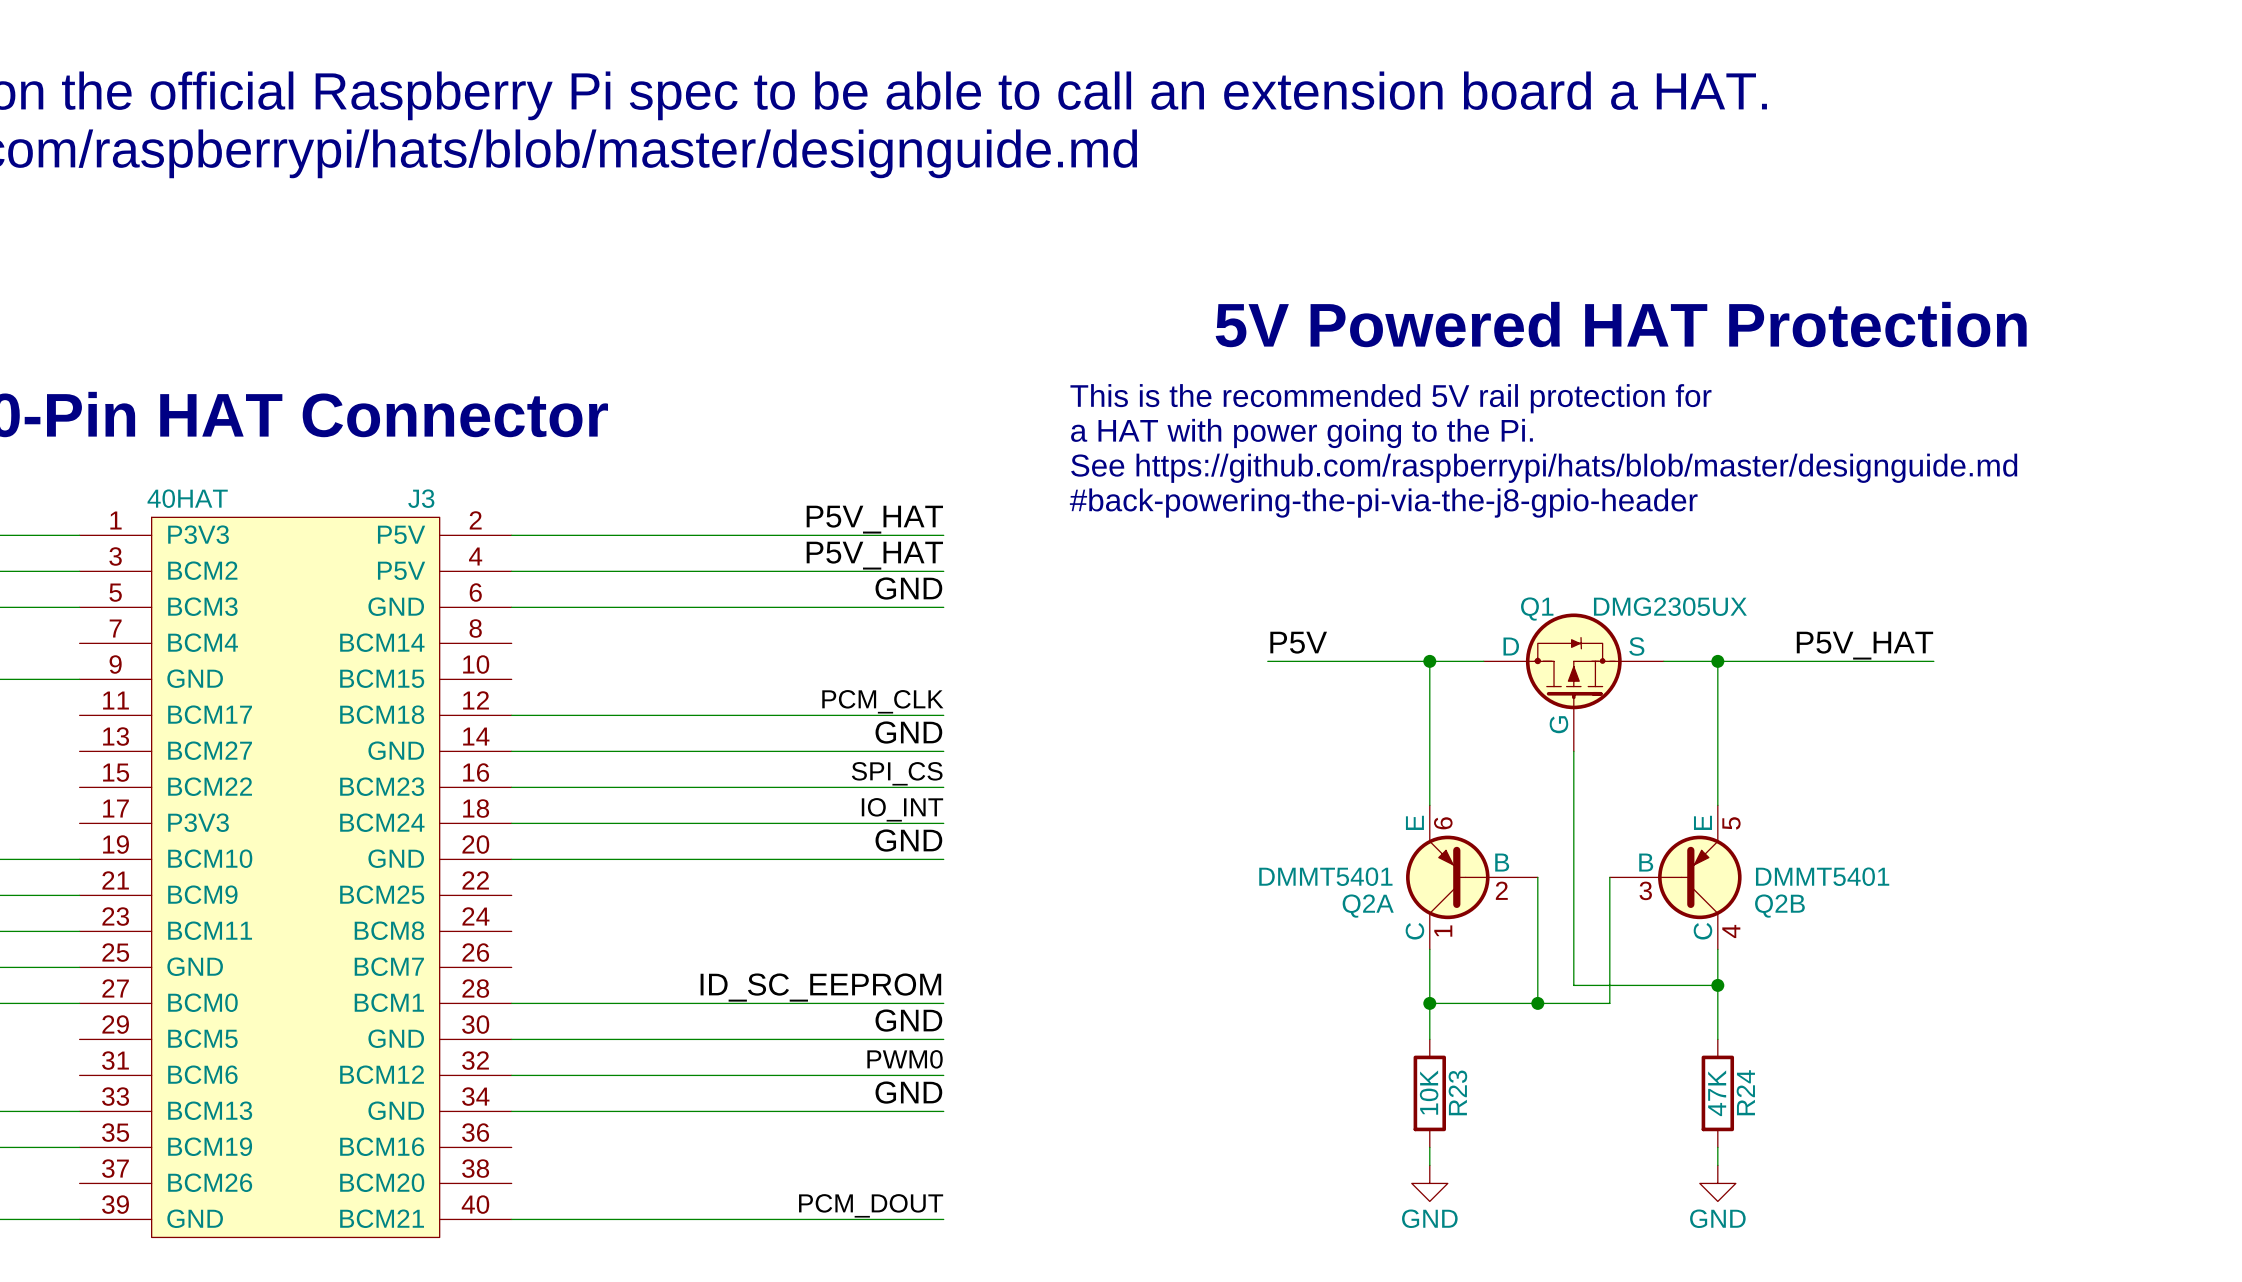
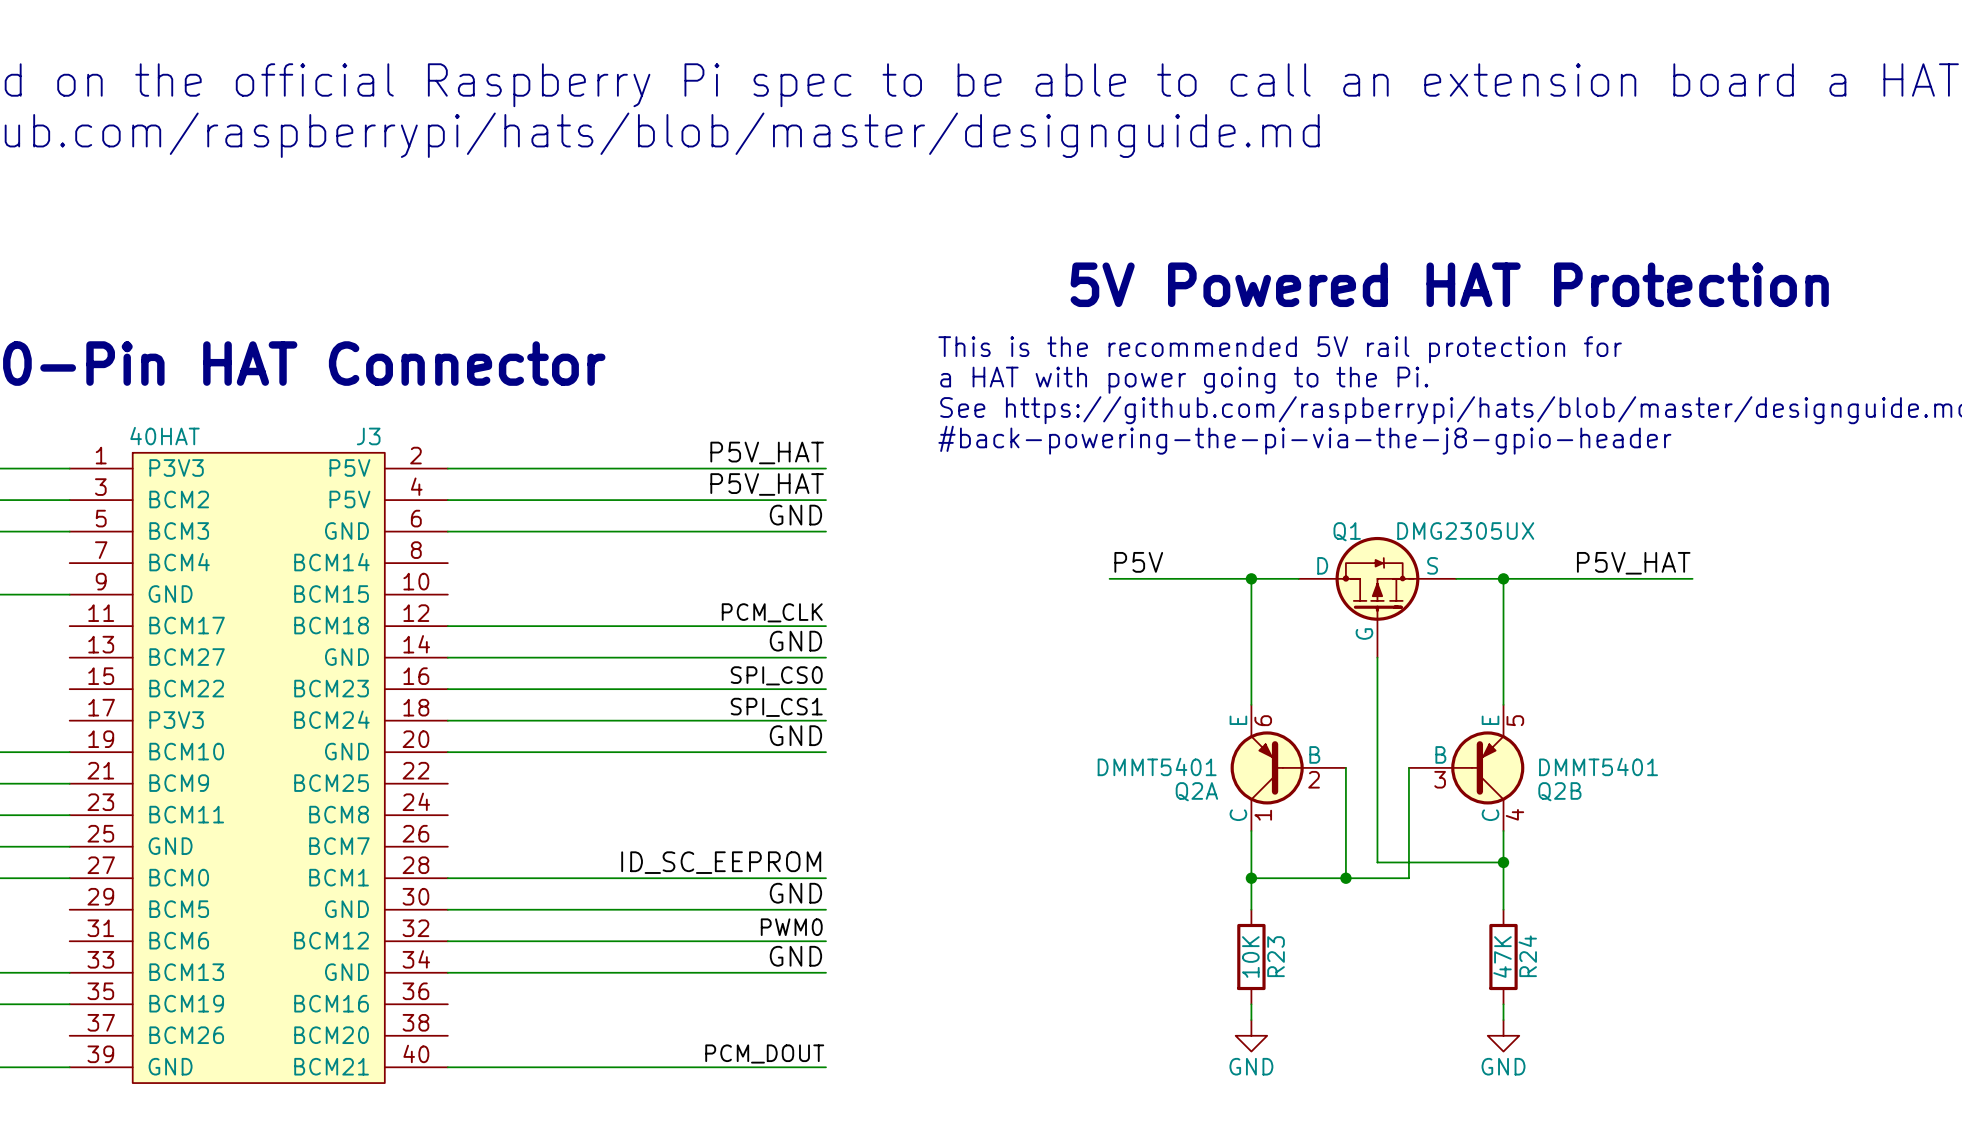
label: SPI_CS (897, 773) -> SPI_CS0 (776, 675)
label: IO_INT (902, 809) -> SPI_CS1 (776, 707)

